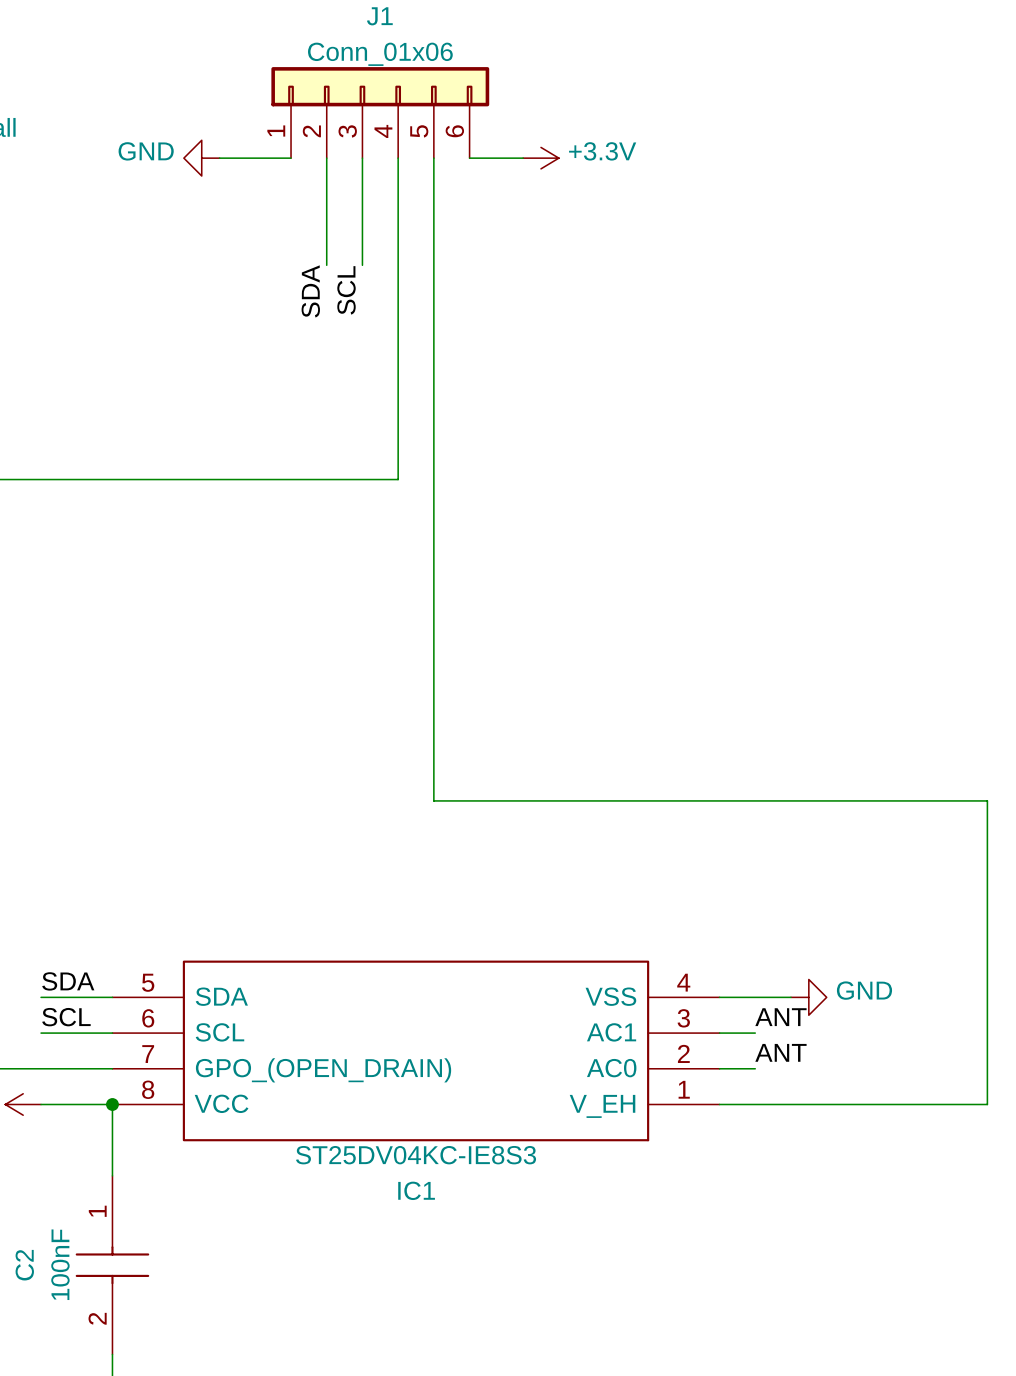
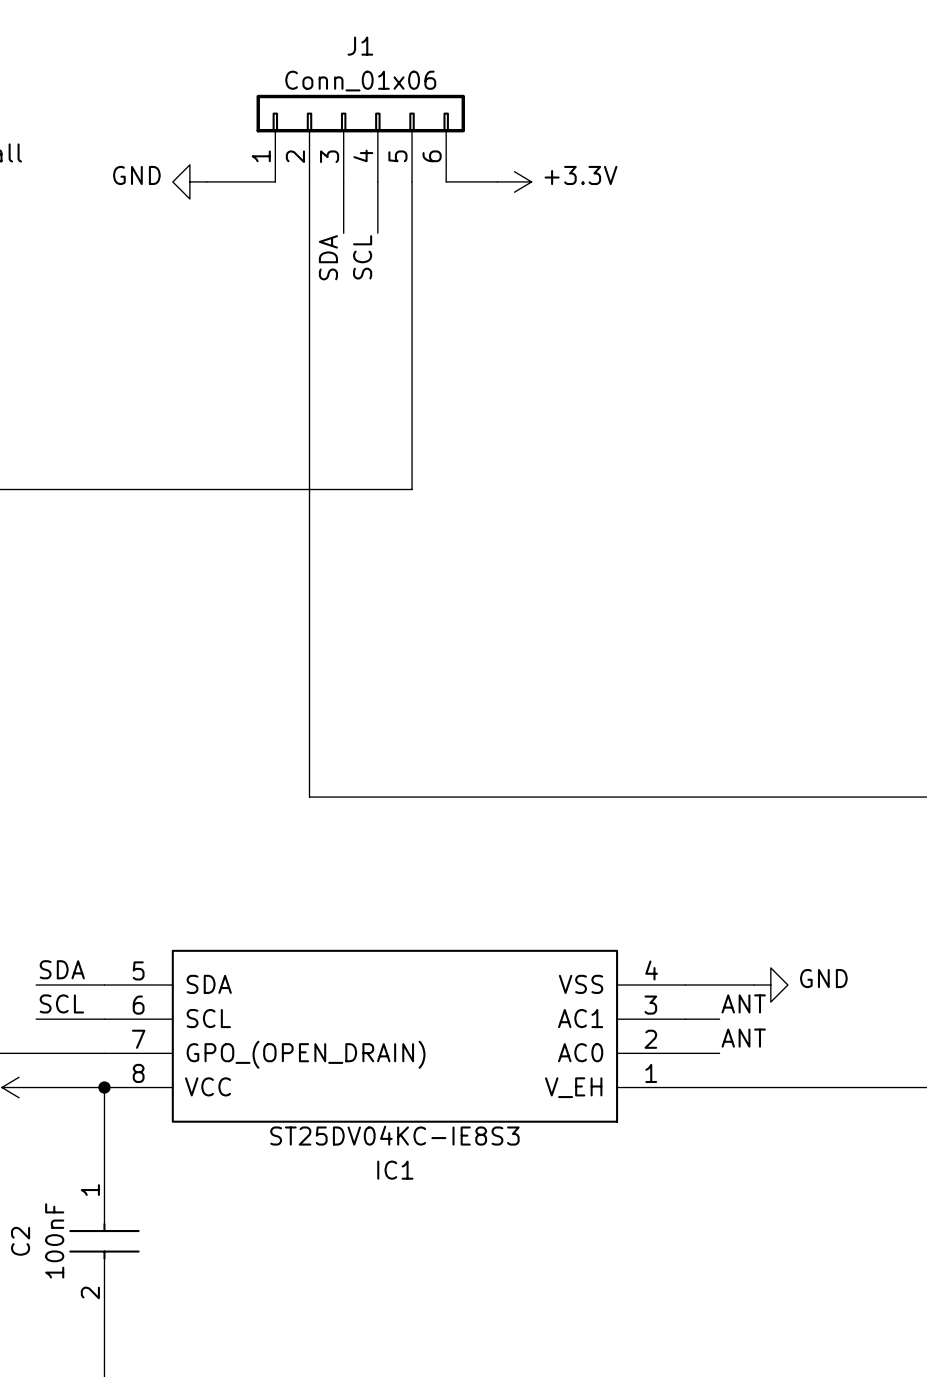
wire: (362, 211) (362, 265) -> none
wire: (398, 211) (398, 479) -> (412, 489) (377, 489)
label position: SCL (346, 290) -> SCL (362, 257)
label position: SDA (310, 291) -> SDA (328, 257)
wire: (433, 479) (433, 800) -> (309, 284) (309, 797) (412, 797)

